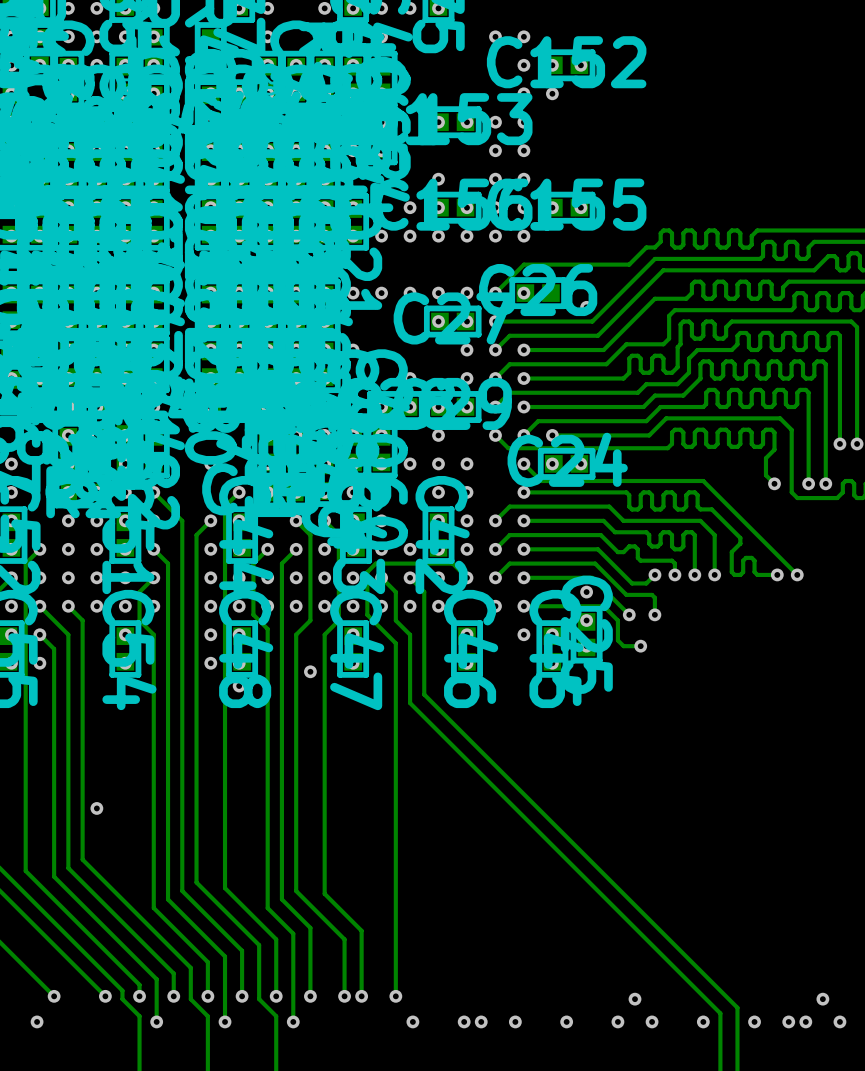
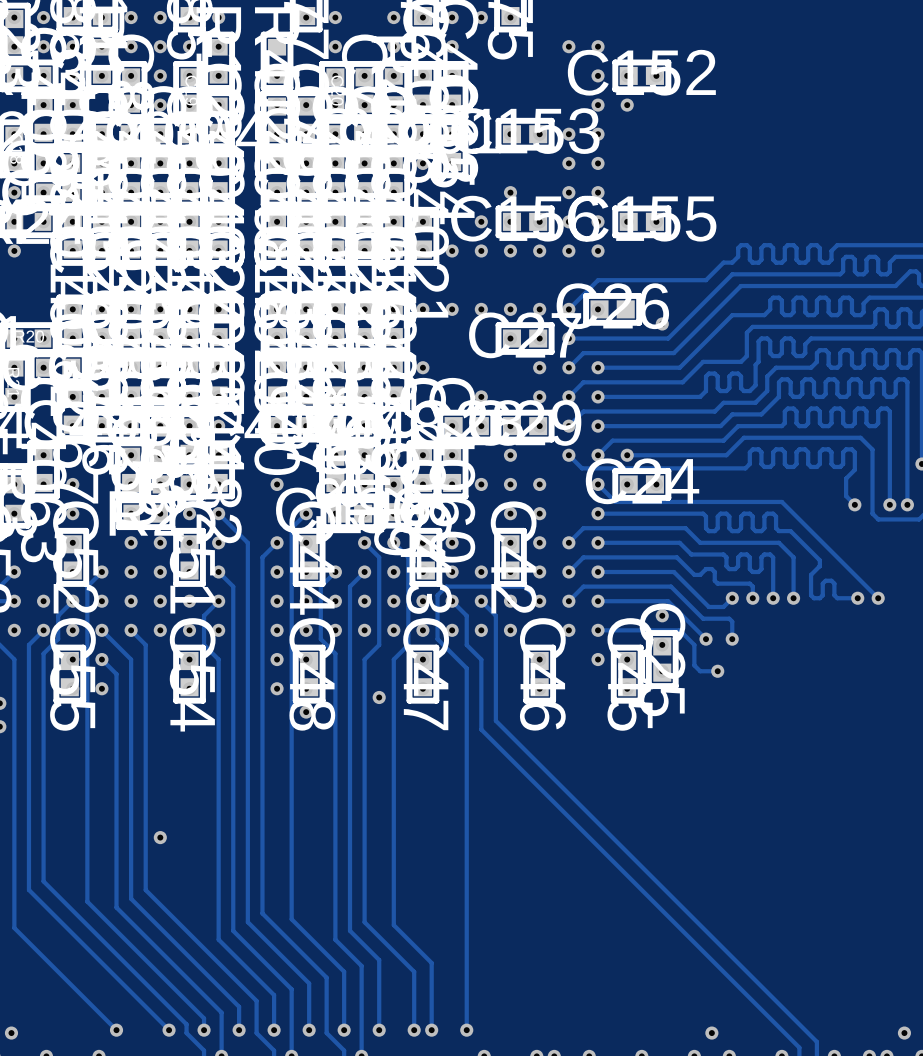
via: none -> (160, 105)

